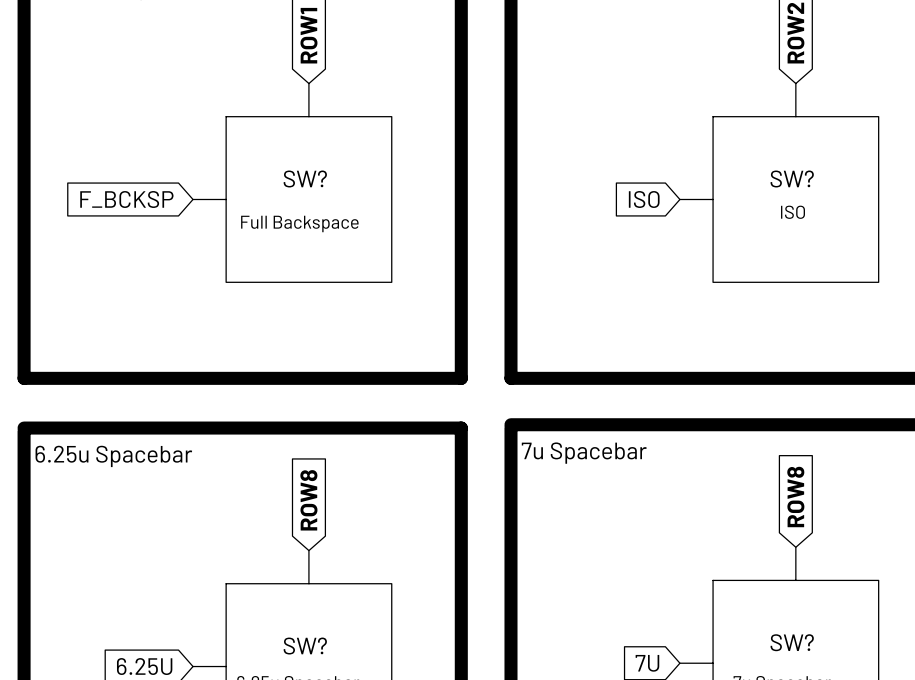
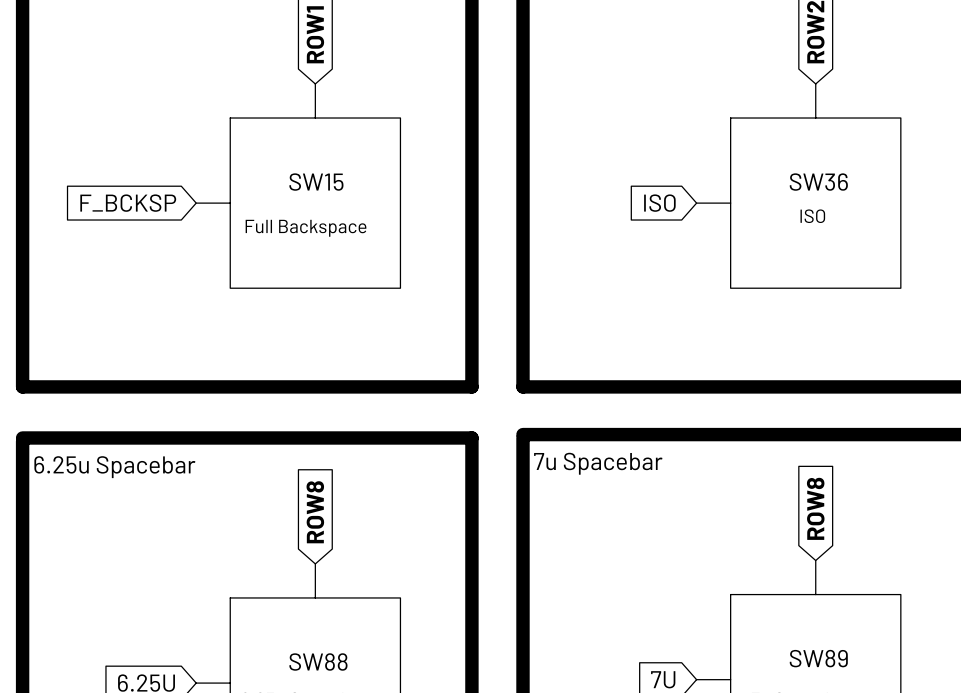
SW? name: SW? (305, 178) -> SW15 (316, 182)
SW? name: SW? (792, 178) -> SW36 (818, 182)
SW? name: SW? (792, 642) -> SW89 (818, 658)
SW? name: SW? (305, 646) -> SW88 (318, 661)

